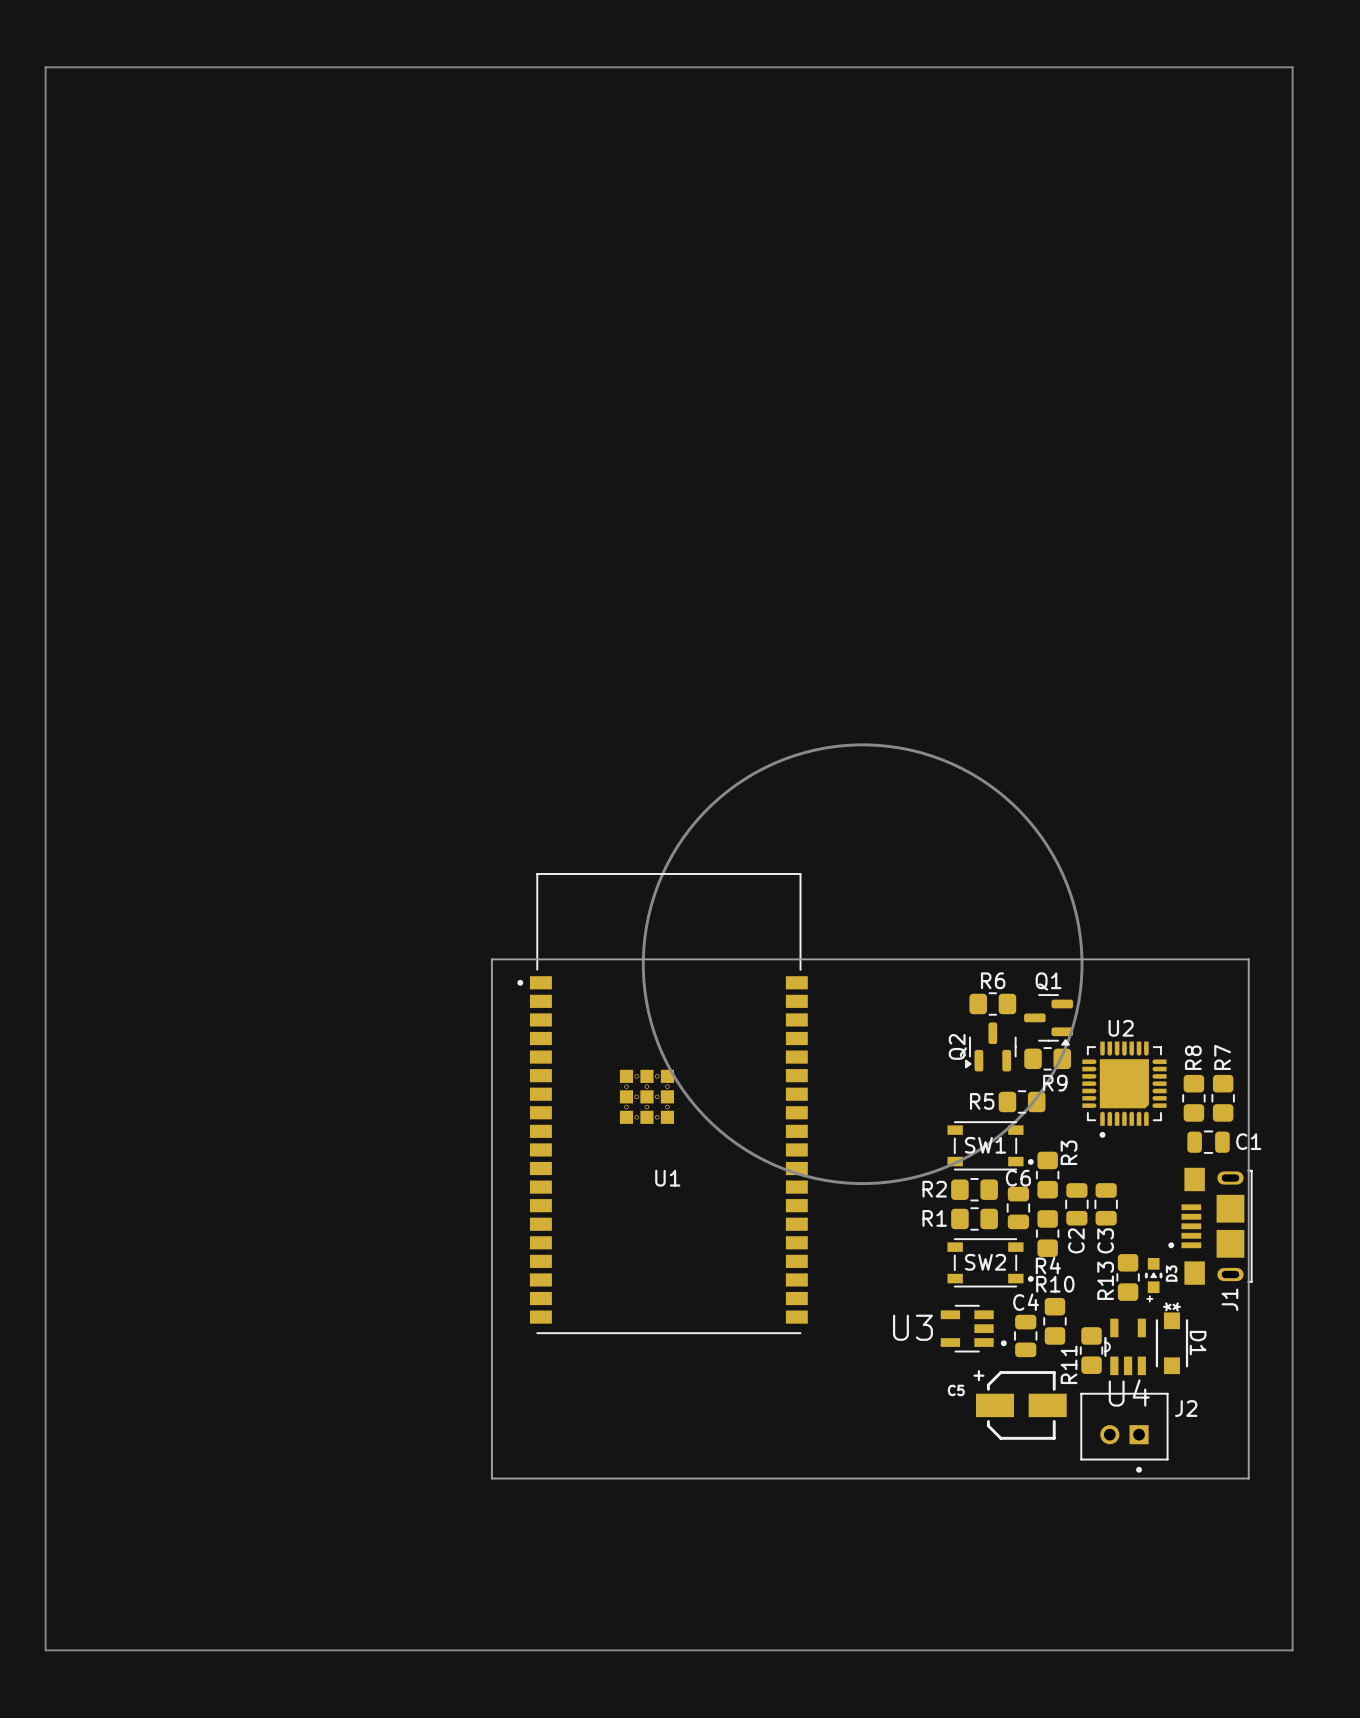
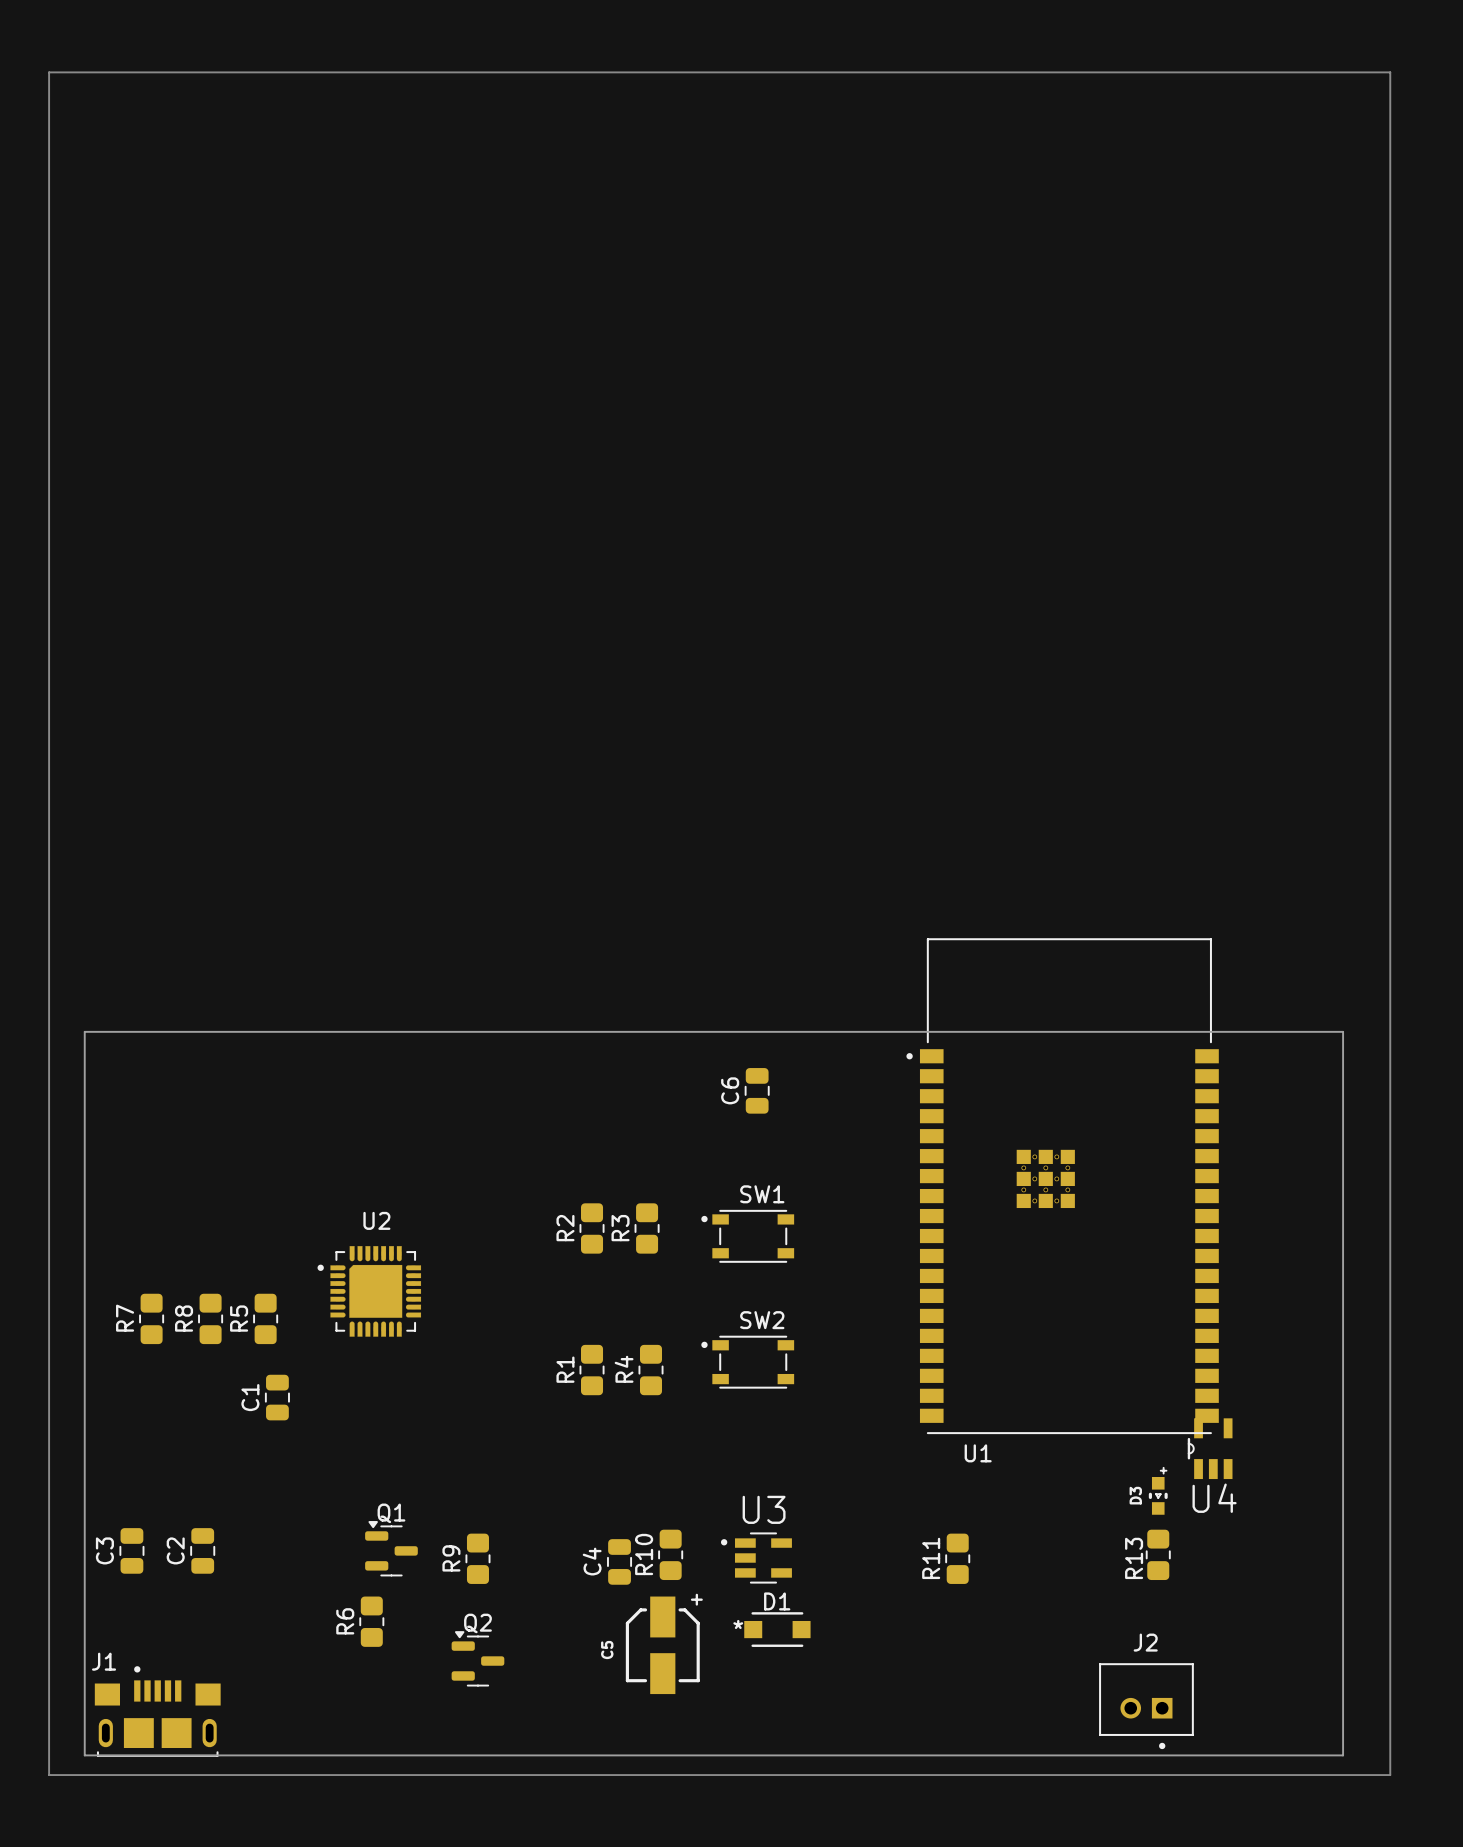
drawing: [641, 743, 1084, 1186] -> none
board edge: (491, 959) (491, 1478) (1248, 1478) -> (529, 1031) (84, 1031) (84, 1755) (1343, 1755) (1343, 1590)
R6 name position: R6 (993, 980) -> R6 (345, 1621)
R6 rotation: 0° (992, 1003) -> 90° clockwise (371, 1621)
R6 position: (992, 1003) -> (371, 1621)
Q1 rotation: 0° (1048, 1019) -> 180° (391, 1548)
Q1 position: (1048, 1019) -> (391, 1548)
U2 footprint: [1082, 1041, 1167, 1138] -> [317, 1246, 422, 1337]
Q2 rotation: 0° (990, 1046) -> 90° clockwise (477, 1658)
Q2 position: (990, 1046) -> (477, 1658)
R8 name position: R8 (1193, 1057) -> R8 (184, 1318)
R7 name position: R7 (1222, 1057) -> R7 (125, 1318)
R9 rotation: 0° (1047, 1058) -> 90° clockwise (477, 1558)
R9 position: (1047, 1058) -> (477, 1558)
R8 position: (1193, 1098) -> (210, 1318)
R7 position: (1223, 1098) -> (151, 1318)
R5 rotation: 0° (1022, 1101) -> 90° clockwise (265, 1318)
R5 position: (1022, 1101) -> (265, 1318)
U1 position: (662, 1103) -> (1062, 1186)
C1 name position: C1 (1248, 1141) -> C1 (250, 1397)
C1 rotation: 0° (1208, 1142) -> 90° clockwise (277, 1397)
C1 position: (1208, 1142) -> (277, 1397)
SW1 name position: SW1 (985, 1145) -> SW1 (762, 1194)
SW1 rotation: 0° (990, 1145) -> 180° (747, 1236)
SW1 position: (990, 1145) -> (747, 1236)
R3 name position: R3 (1069, 1152) -> R3 (620, 1228)
R3 position: (1047, 1175) -> (647, 1228)
U1 name position: U1 (667, 1178) -> U1 (978, 1453)
C6 name rotation: 0° (1018, 1178) -> 90° counterclockwise (730, 1090)
C6 name position: C6 (1018, 1178) -> C6 (730, 1090)
R2 rotation: 0° (974, 1189) -> 90° clockwise (592, 1228)
R2 position: (974, 1189) -> (592, 1228)
C2 position: (1076, 1204) -> (202, 1550)
C3 position: (1106, 1204) -> (131, 1550)
C6 position: (1018, 1207) -> (757, 1090)
R1 rotation: 0° (974, 1218) -> 90° clockwise (592, 1370)
R1 position: (974, 1218) -> (592, 1370)
J1 rotation: 0° (1210, 1226) -> 90° clockwise (157, 1711)
J1 position: (1210, 1226) -> (157, 1711)
R4 position: (1047, 1233) -> (651, 1370)
C2 name position: C2 (1076, 1240) -> C2 (175, 1550)
C3 name position: C3 (1105, 1240) -> C3 (104, 1550)
SW2 name position: SW2 (985, 1262) -> SW2 (762, 1320)
SW2 rotation: 0° (990, 1262) -> 180° (747, 1362)
SW2 position: (990, 1262) -> (747, 1362)
R4 name rotation: 0° (1048, 1265) -> 90° counterclockwise (624, 1369)
R4 name position: R4 (1048, 1265) -> R4 (624, 1369)
D3 rotation: 0° (1153, 1275) -> 180° (1158, 1495)
D3 position: (1153, 1275) -> (1158, 1495)
R13 position: (1128, 1277) -> (1158, 1554)
R10 name rotation: 0° (1055, 1284) -> 90° counterclockwise (644, 1554)
J1 name position: J1 (1229, 1299) -> J1 (104, 1661)
C4 name rotation: 0° (1026, 1302) -> 90° counterclockwise (592, 1561)
C4 name position: C4 (1026, 1302) -> C4 (592, 1561)
R10 position: (1054, 1321) -> (670, 1554)
U3 name position: U3 (912, 1327) -> U3 (764, 1509)
U3 rotation: 0° (973, 1328) -> 180° (756, 1558)
U3 position: (973, 1328) -> (756, 1558)
C4 position: (1025, 1335) -> (619, 1561)
D1 rotation: 0° (1171, 1343) -> 90° counterclockwise (777, 1629)
D1 position: (1171, 1343) -> (777, 1629)
R11 position: (1091, 1350) -> (957, 1558)
R11 name position: R11 (1069, 1364) -> R11 (931, 1558)
C5 rotation: 0° (1021, 1405) -> 90° clockwise (662, 1645)
C5 position: (1021, 1405) -> (662, 1645)
J2 name position: J2 (1186, 1408) -> J2 (1145, 1642)
J2 position: (1124, 1432) -> (1146, 1706)

